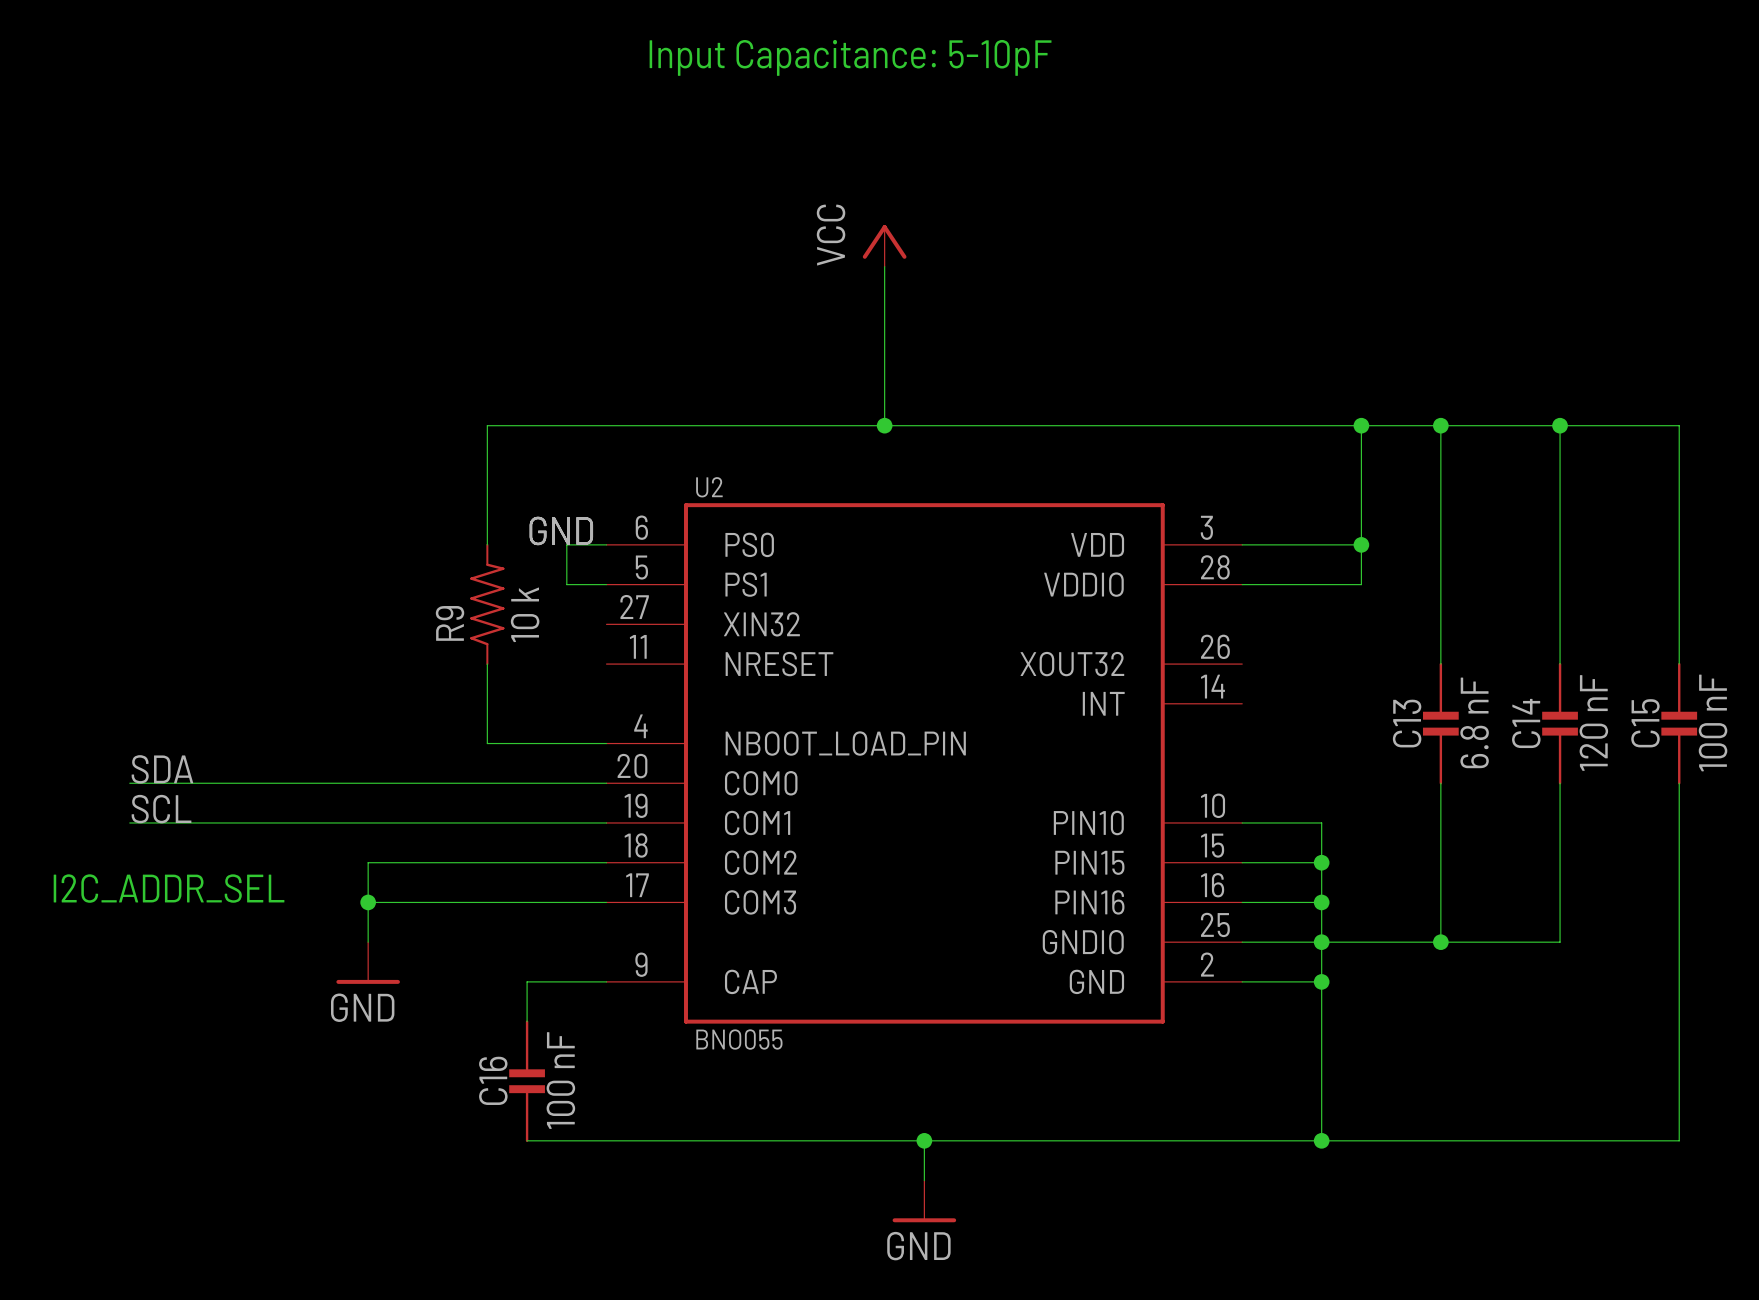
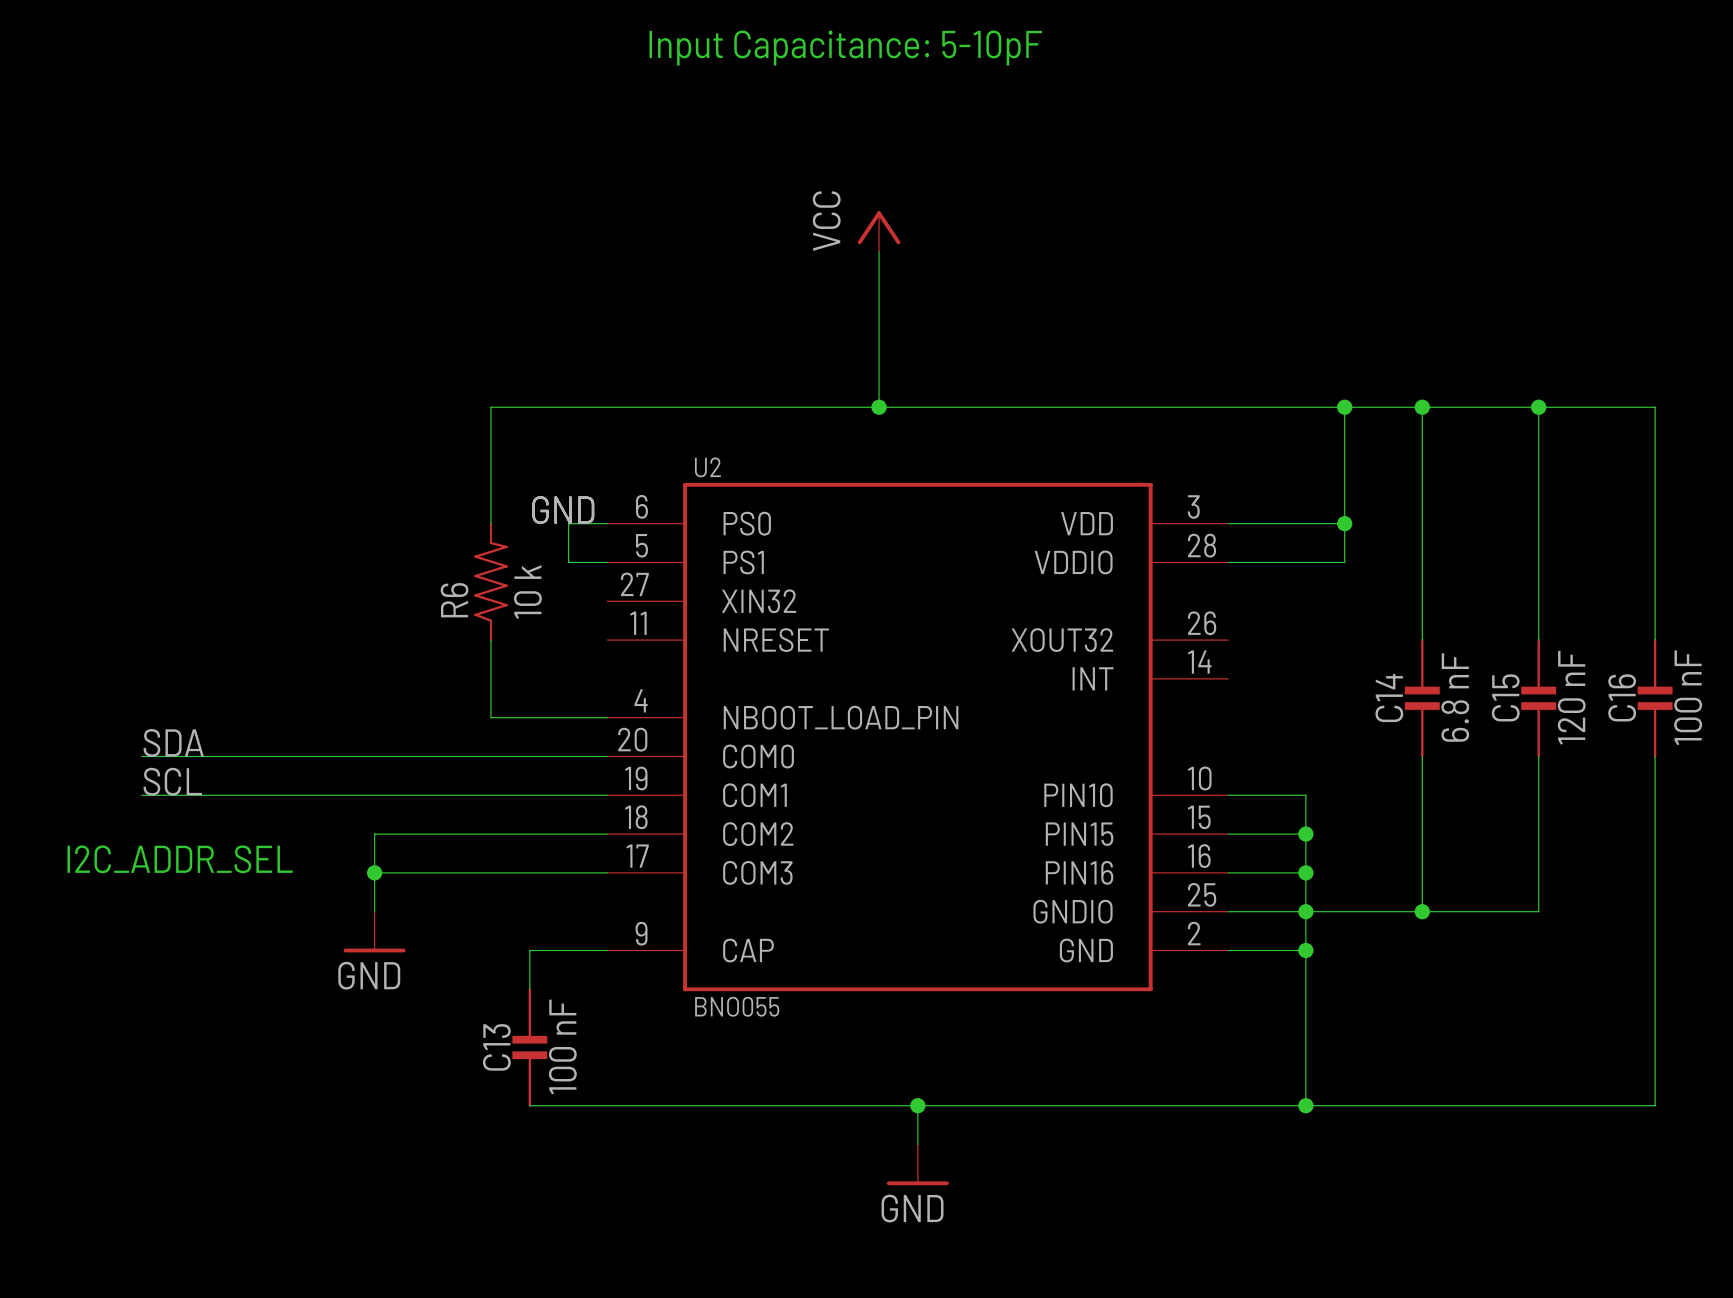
R9 name: R9 (450, 623) -> R6 (454, 600)
C13 name: C13 (1407, 723) -> C14 (1389, 698)
C14 name: C14 (1526, 723) -> C15 (1505, 697)
C15 name: C15 (1645, 723) -> C16 (1622, 697)
C16 name: C16 (493, 1080) -> C13 (496, 1047)

